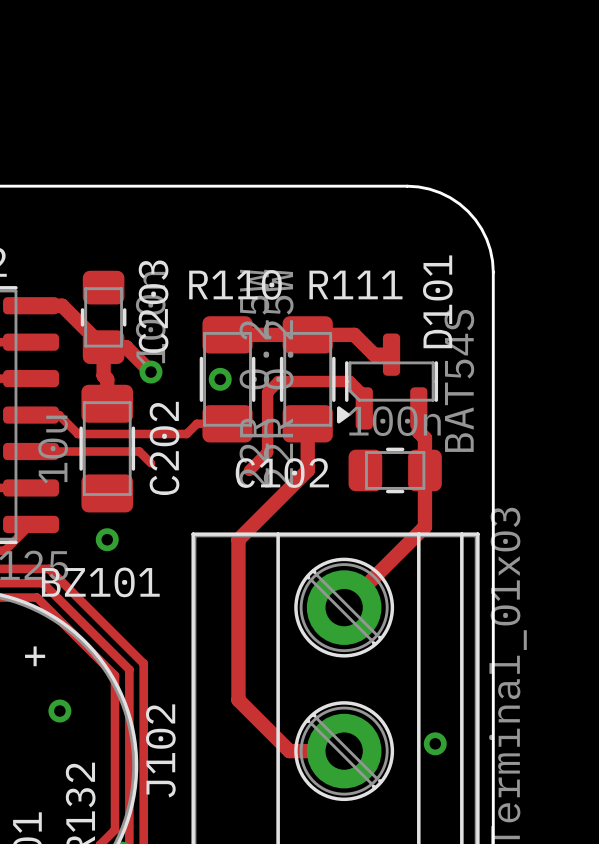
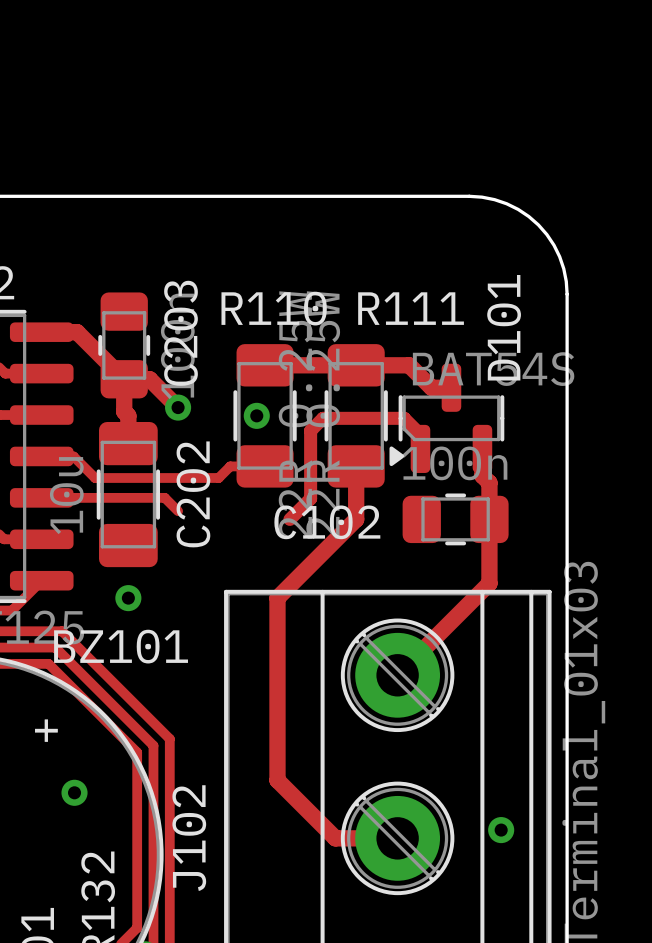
D101 value rotation: 0° (459, 380) -> 90° clockwise (493, 369)

